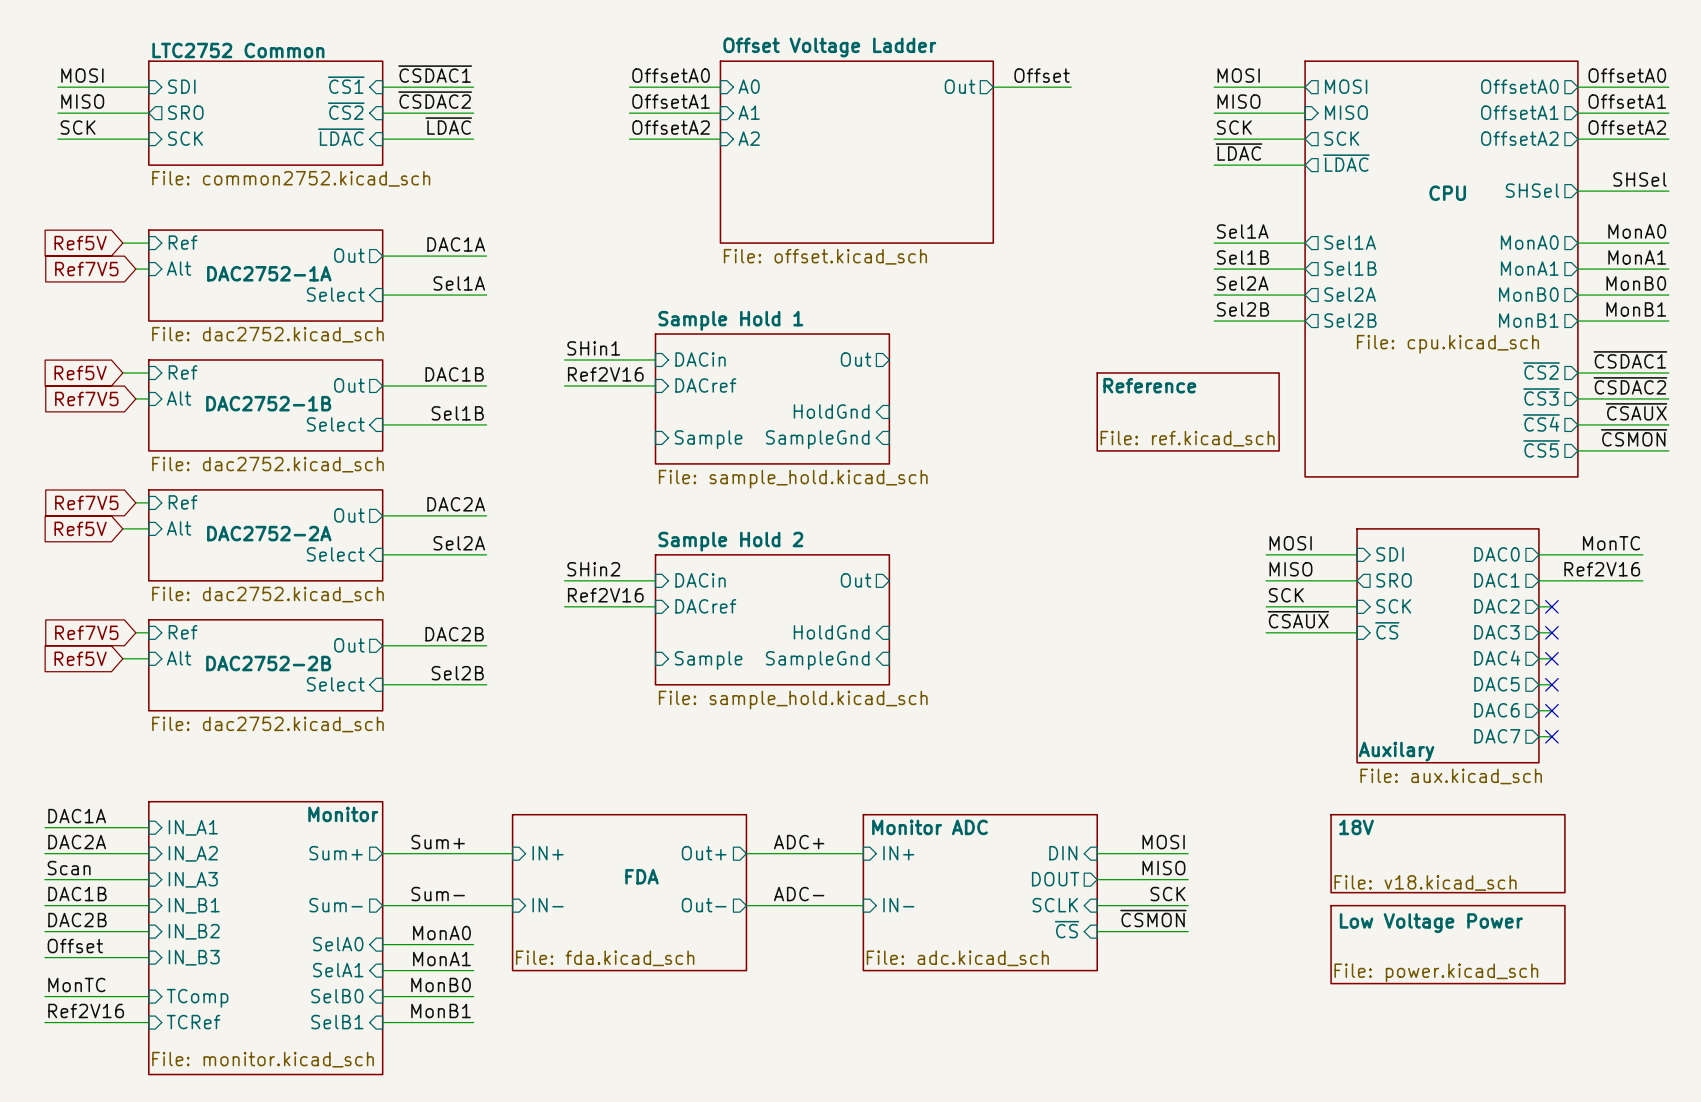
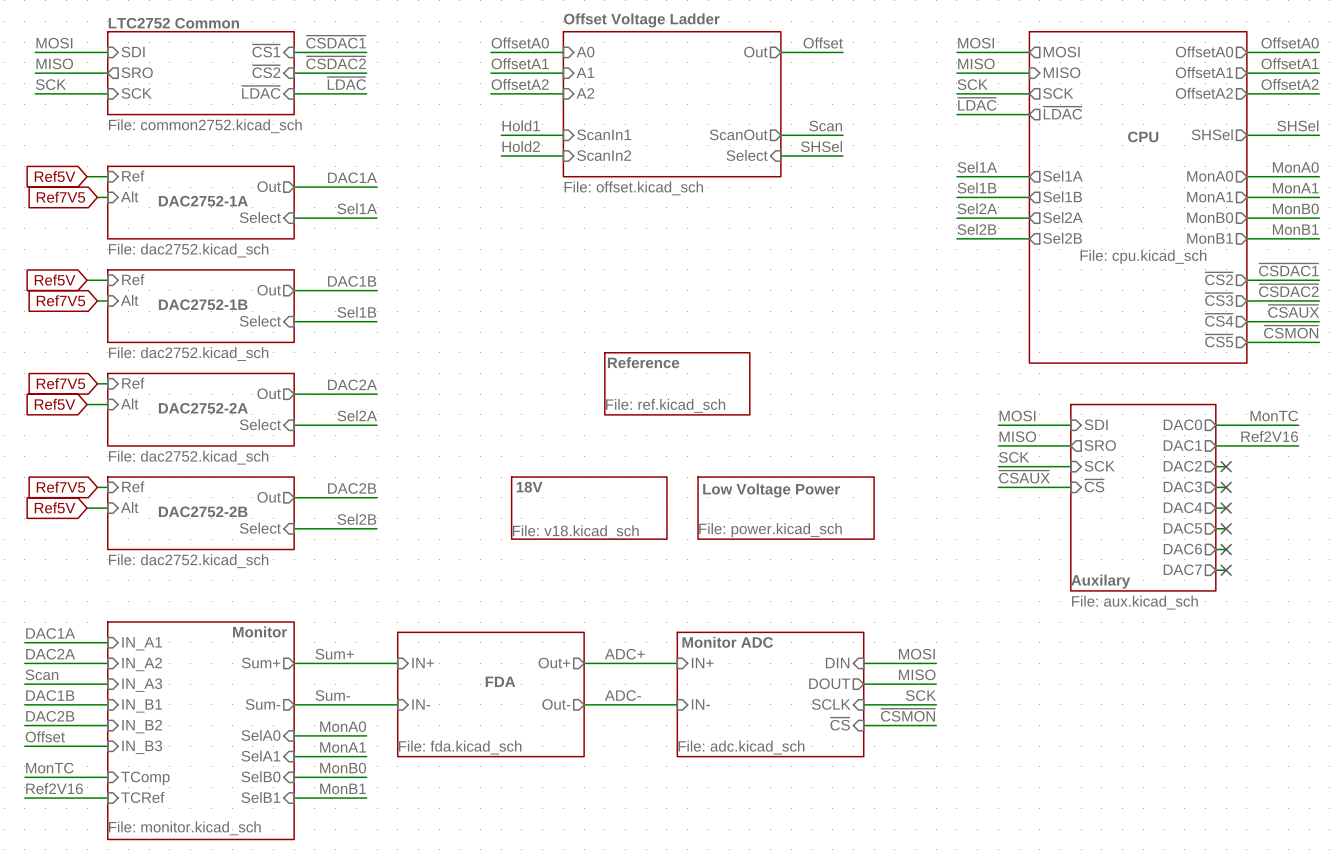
label: none -> Hold1 (521, 125)
label: none -> Scan (825, 126)
sheet pin: none -> ScanIn1 (604, 134)
sheet pin: none -> ScanOut (738, 134)
wire: none -> (501, 135) (563, 135)
wire: none -> (780, 135) (843, 135)
label: none -> Hold2 (521, 146)
label: none -> SHSel (821, 146)
sheet pin: none -> ScanIn2 (604, 155)
sheet pin: none -> Select (747, 155)
wire: none -> (501, 156) (563, 156)
wire: none -> (780, 156) (843, 156)
label: SHin1 (593, 348) -> none
wire: (564, 359) (655, 359) -> none
sheet pin: DACin (700, 359) -> none
sheet pin: Out (856, 359) -> none
label: Ref2V16 (605, 374) -> none
wire: (564, 385) (655, 385) -> none
sheet pin: DACref (705, 385) -> none
sheet Sample Hold 1: File: sample_hold.kicad_sch (772, 398) -> none
sheet pin: HoldGnd (831, 411) -> none
sheet Reference: File: ref.kicad_sch (1188, 411) -> none
sheet pin: Sample (708, 439) -> none
sheet pin: SampleGnd (817, 439) -> none
sheet Reference: none -> File: ref.kicad_sch (677, 383)
label: SHin2 (593, 569) -> none
wire: (564, 580) (655, 580) -> none
sheet pin: DACin (700, 580) -> none
sheet pin: Out (856, 580) -> none
label: Ref2V16 (605, 595) -> none
wire: (564, 606) (655, 606) -> none
sheet pin: DACref (705, 606) -> none
sheet Sample Hold 2: File: sample_hold.kicad_sch (772, 619) -> none
sheet pin: HoldGnd (831, 632) -> none
sheet Low Voltage Power: none -> File: power.kicad_sch (786, 508)
sheet pin: Sample (708, 660) -> none
sheet pin: SampleGnd (817, 660) -> none
sheet 18V shape: [1330, 813, 1566, 894] -> [511, 476, 668, 540]
sheet Low Voltage Power: File: power.kicad_sch (1447, 944) -> none

